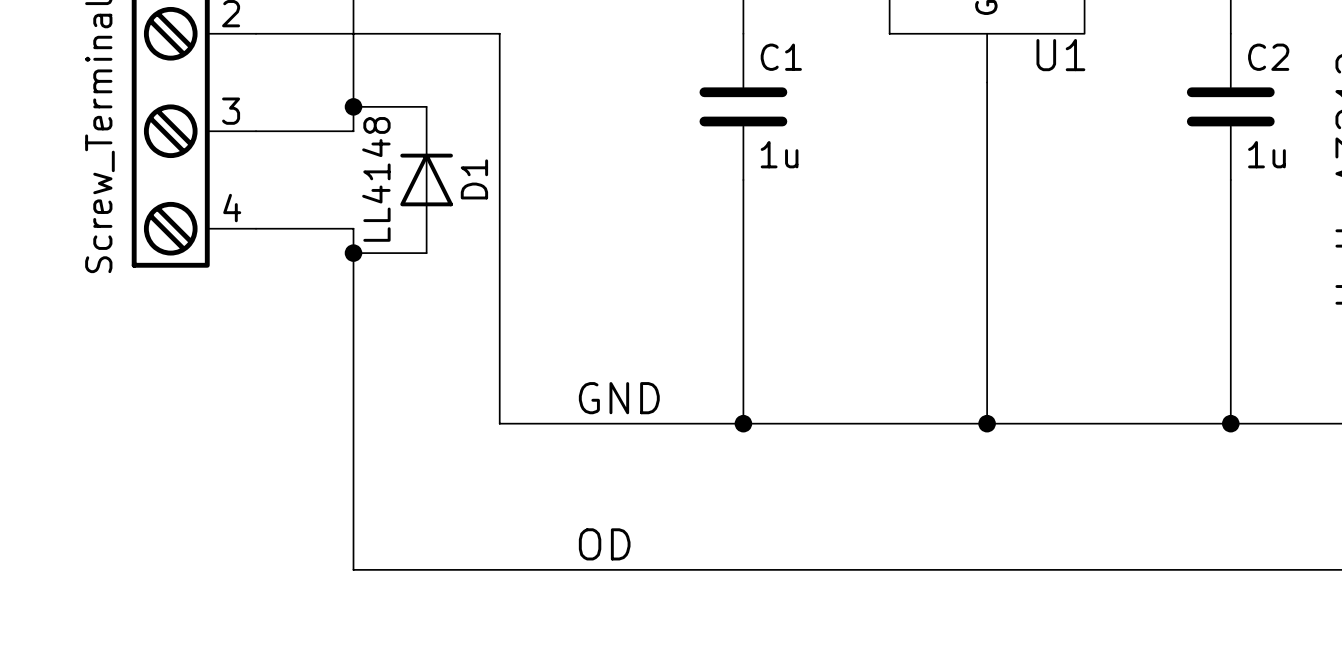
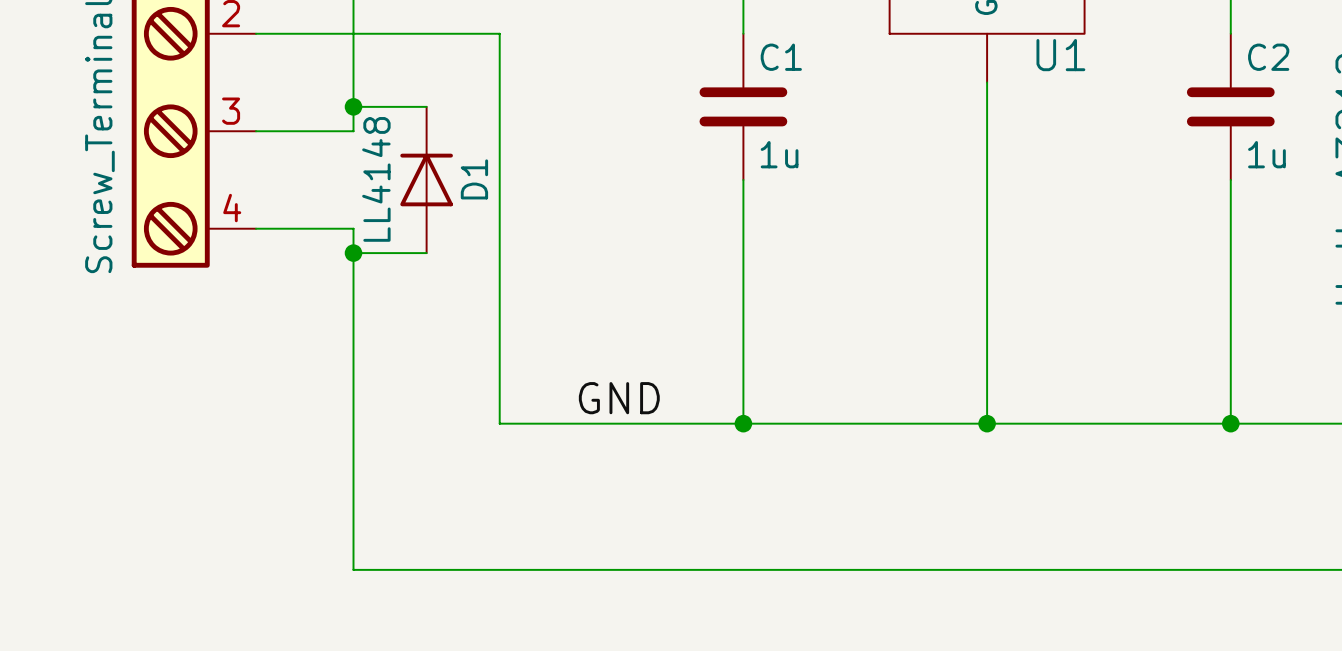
label: OD (604, 544) -> none

